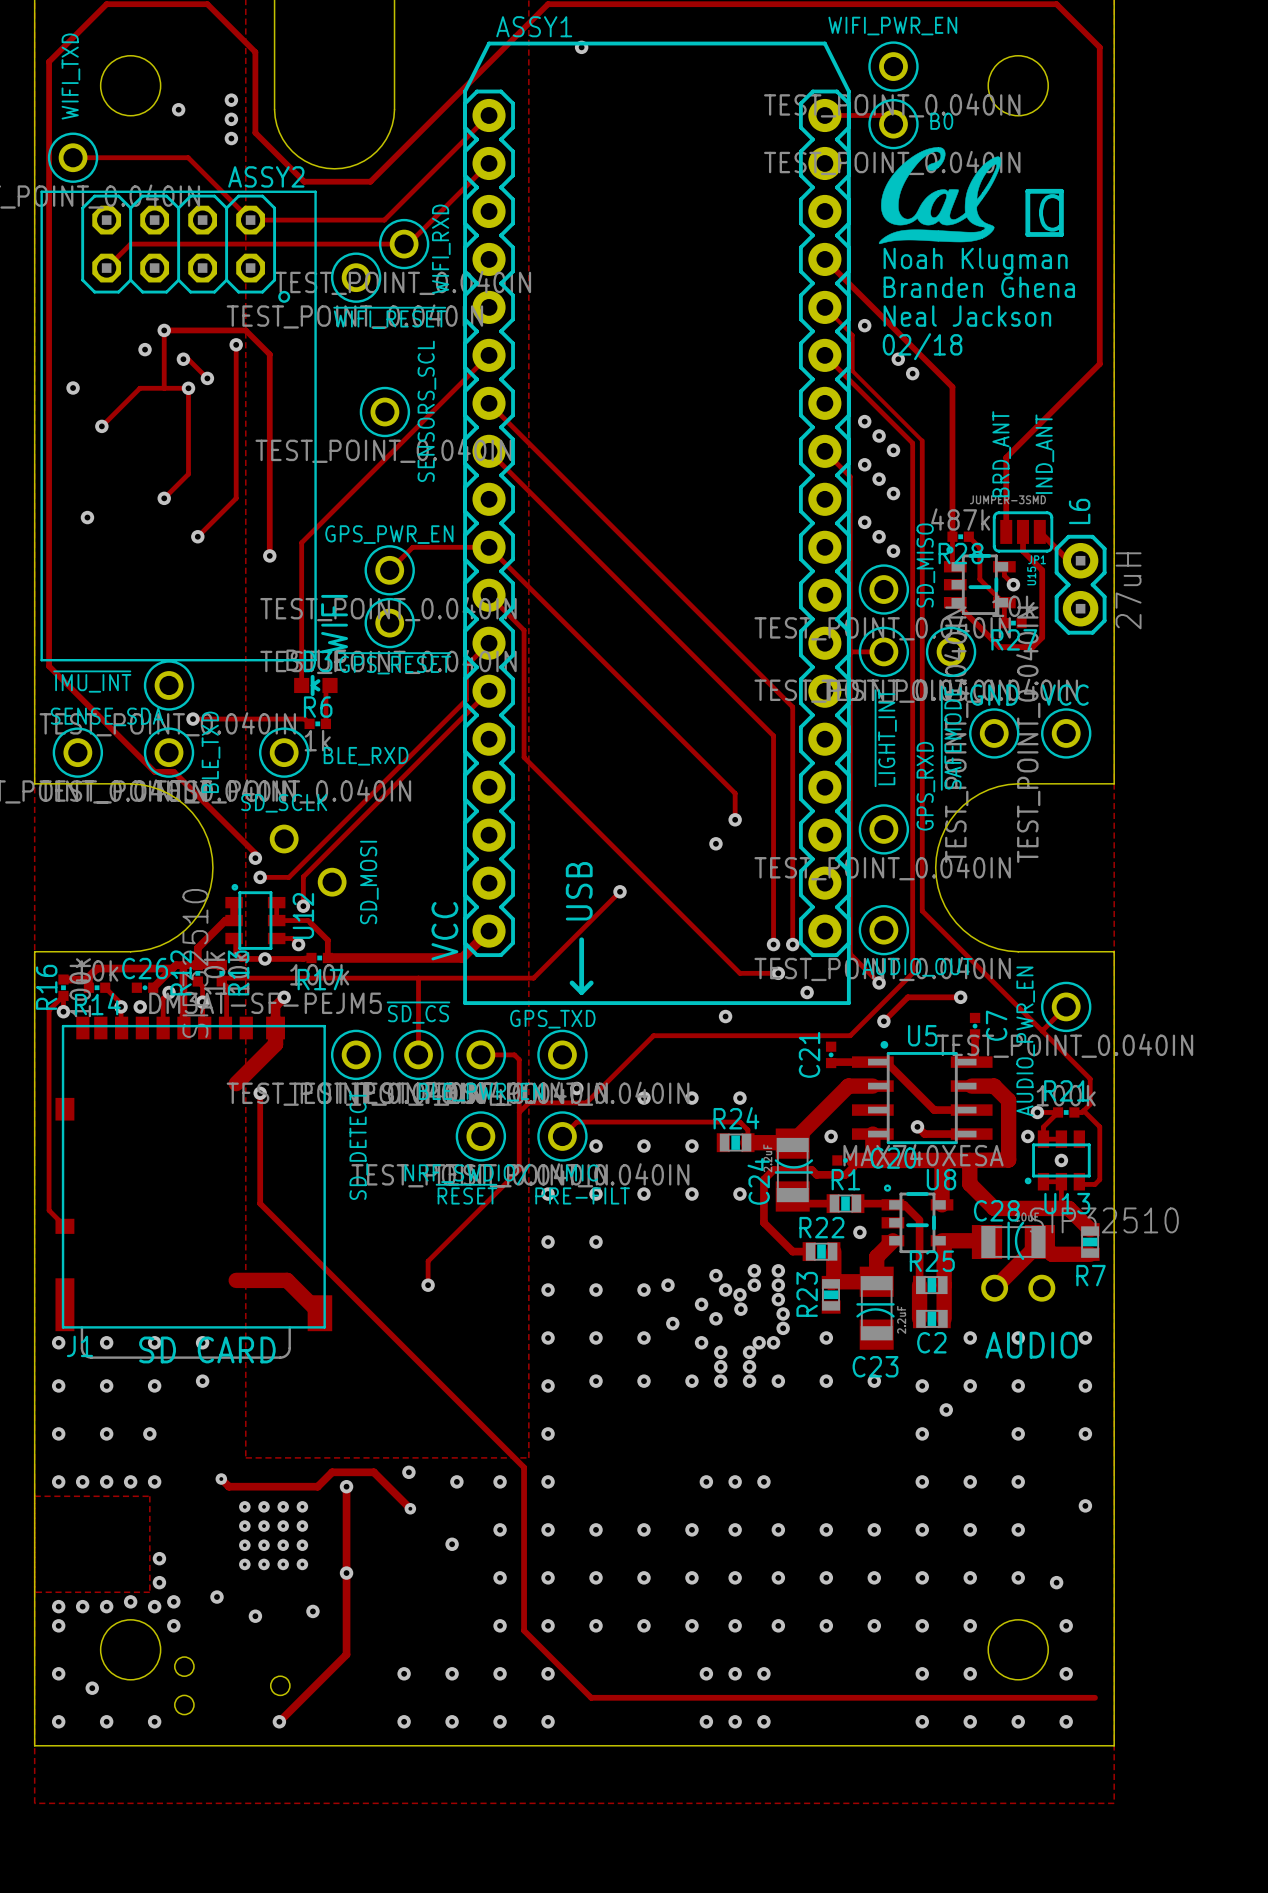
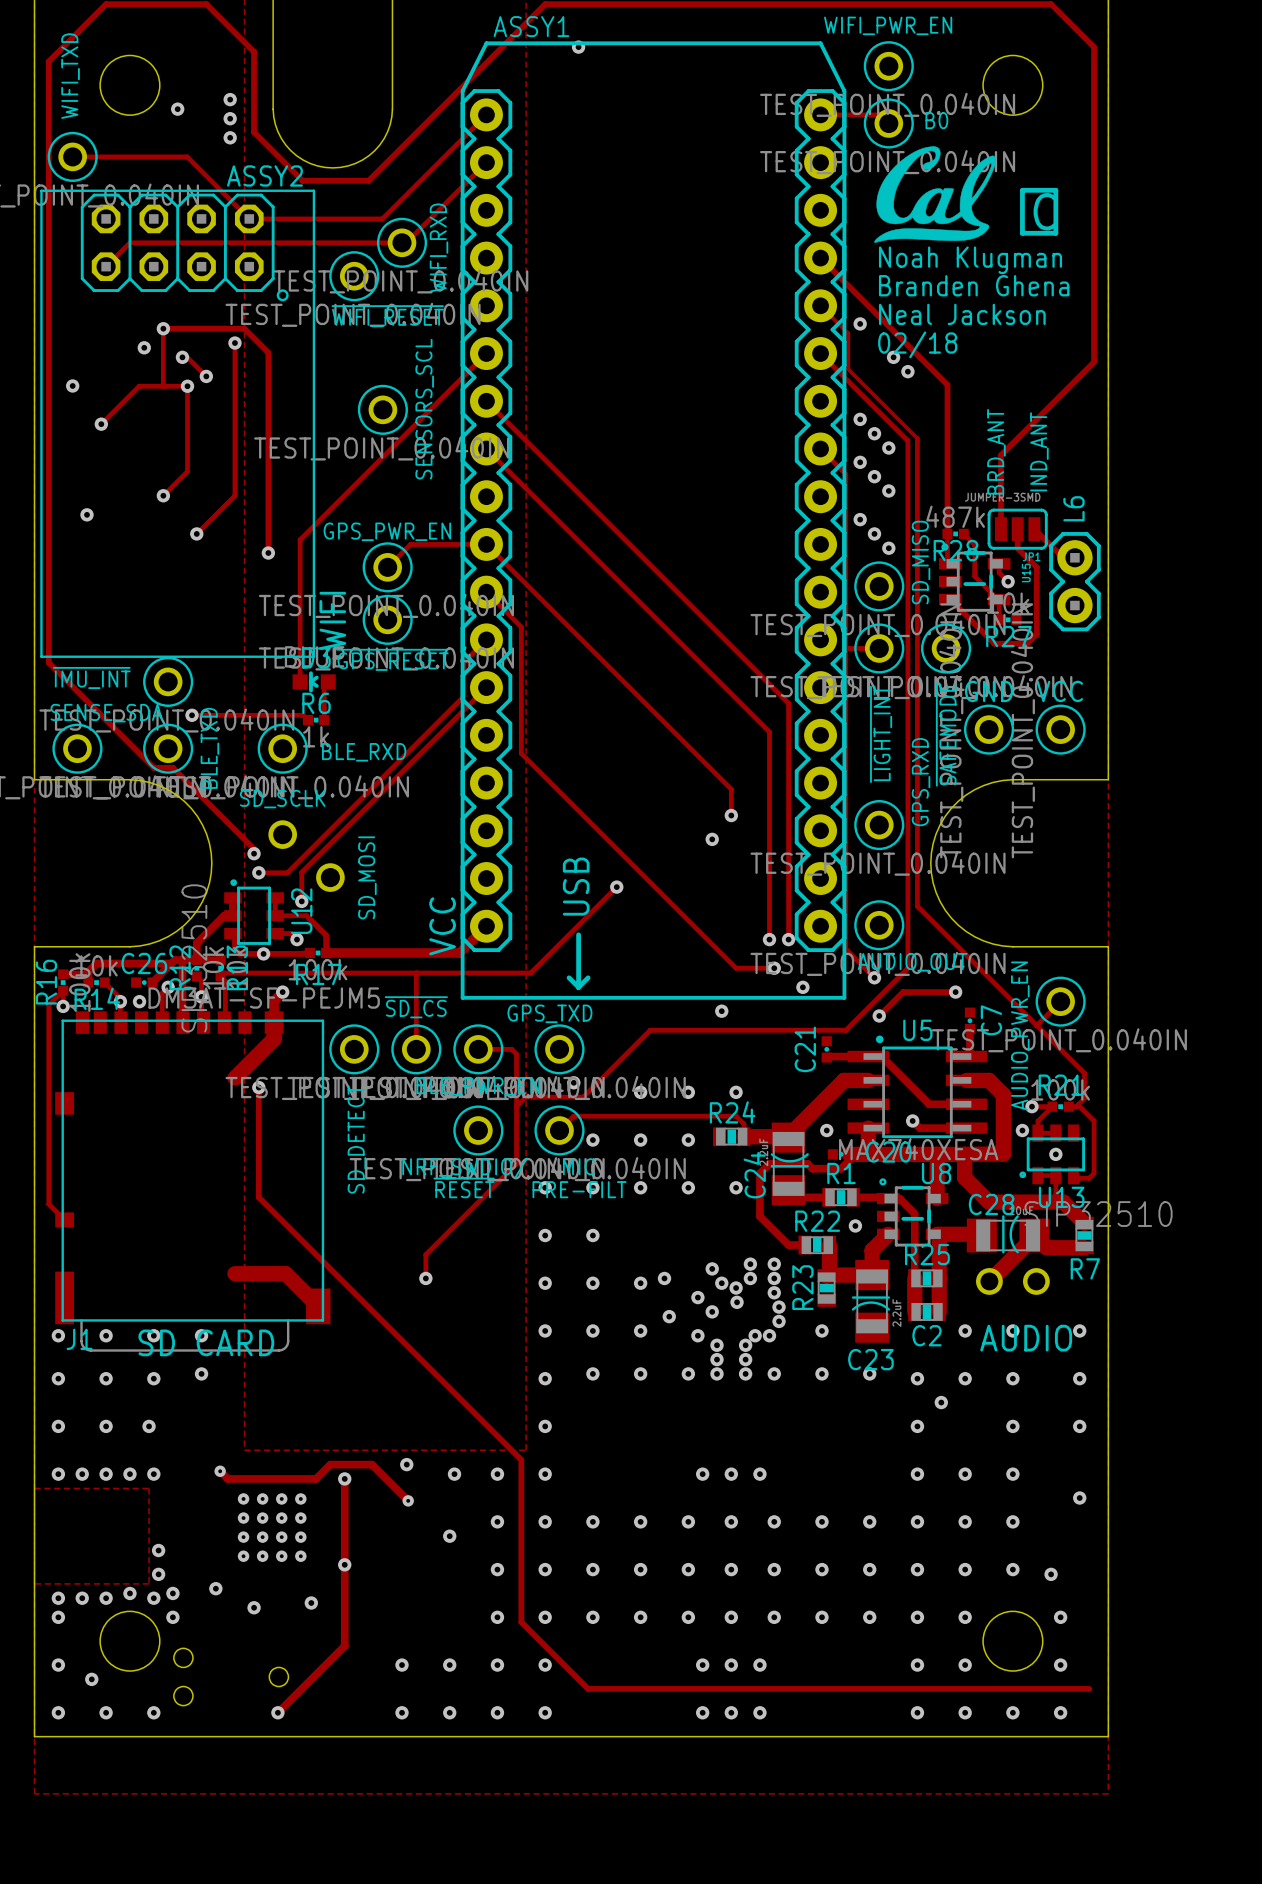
L6 value: 27uH (1128, 590) -> none

